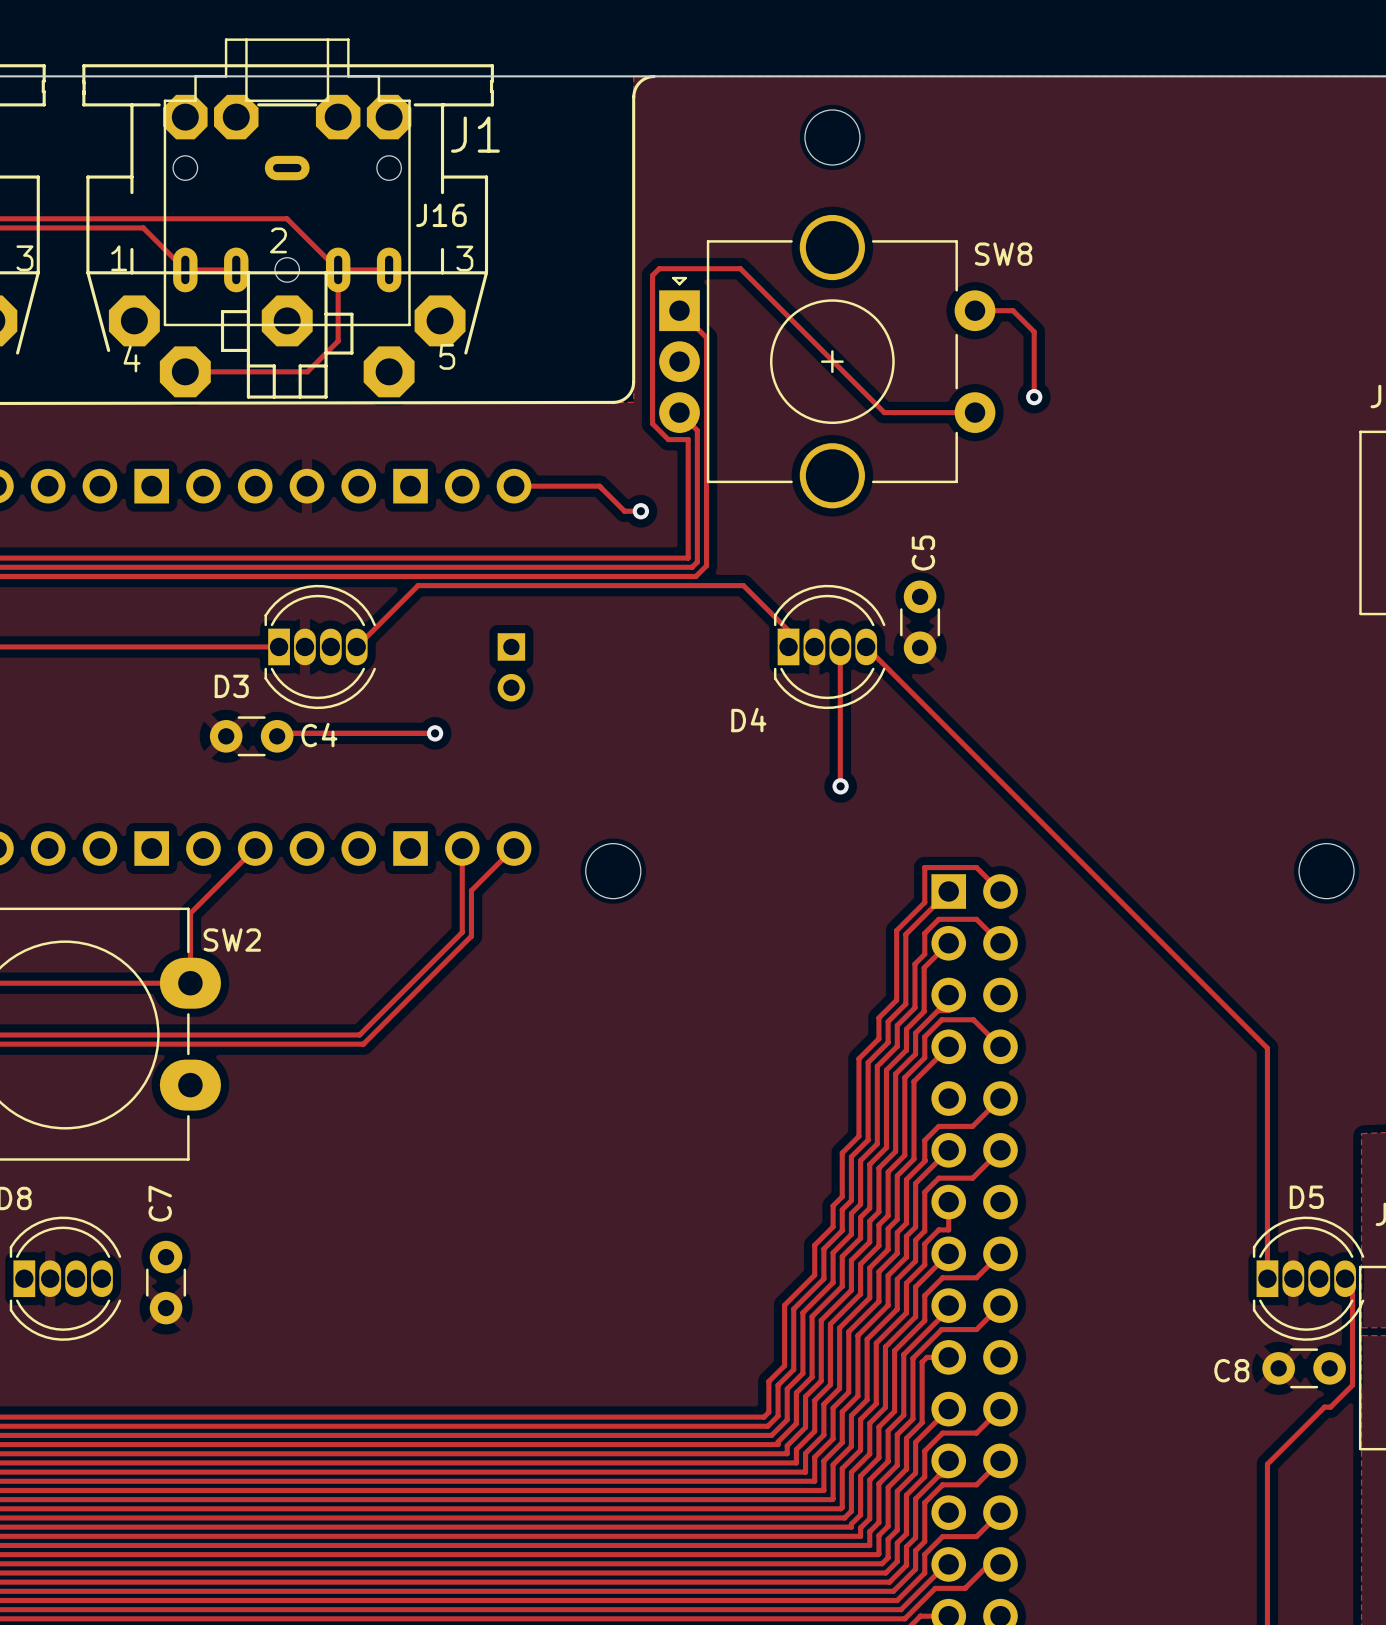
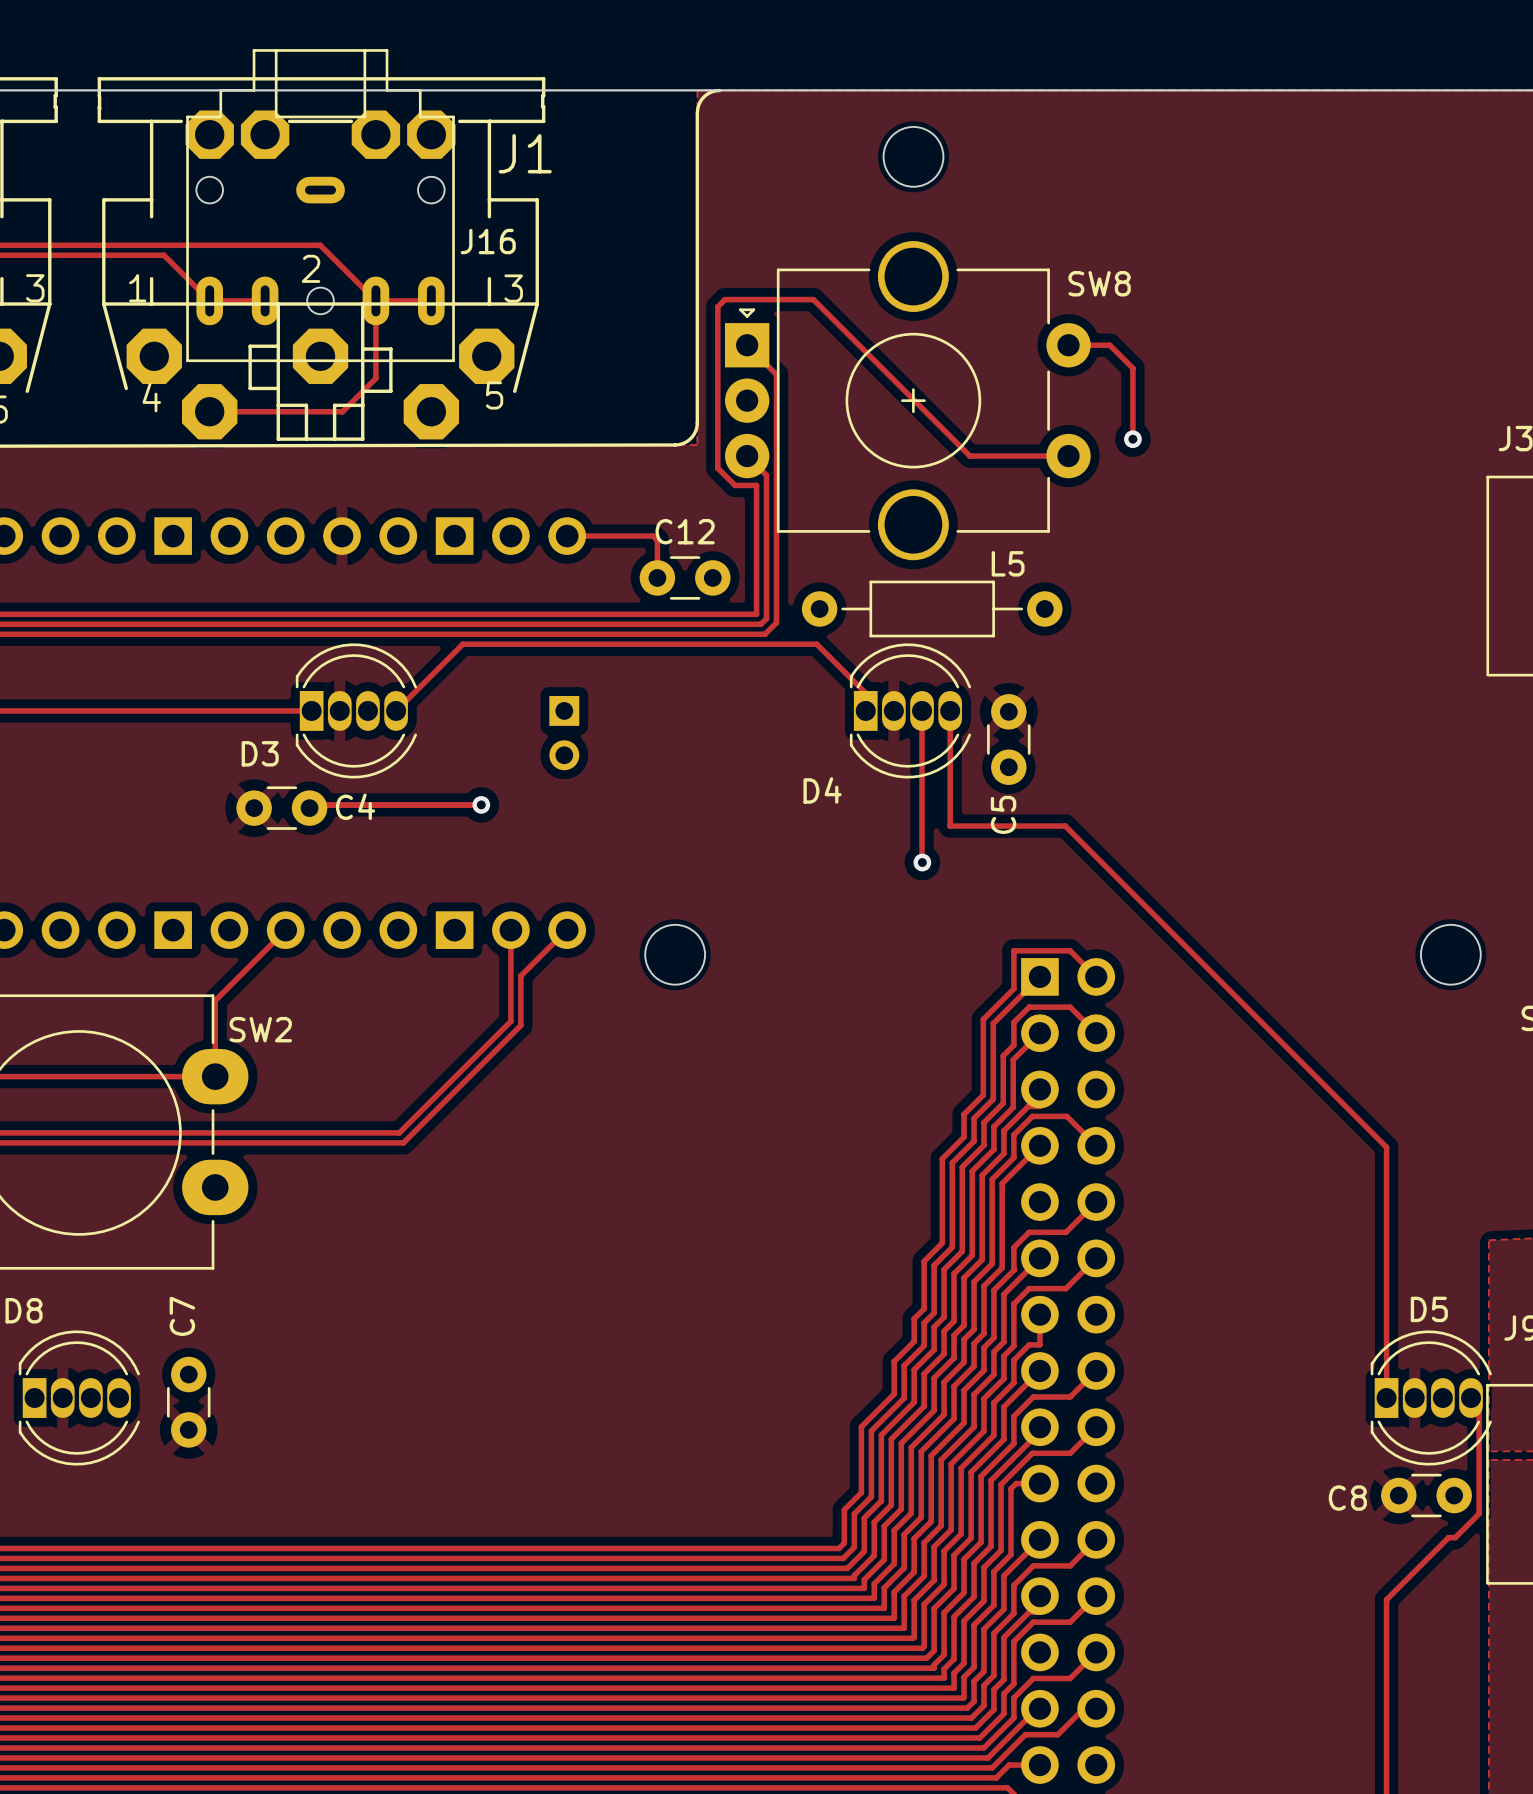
track: (592, 486) (599, 486) (624, 511) (640, 511) -> (652, 536) (657, 540) (657, 569)
via: (640, 511) -> none
C12: none -> (685, 577)
L5: none -> (932, 608)
C5 name position: C5 (923, 553) -> C5 (1003, 814)
C5 position: (920, 622) -> (1008, 739)
track: (866, 646) (972, 752) -> (950, 710) (950, 825)
track: none -> (950, 826) (1065, 826)

